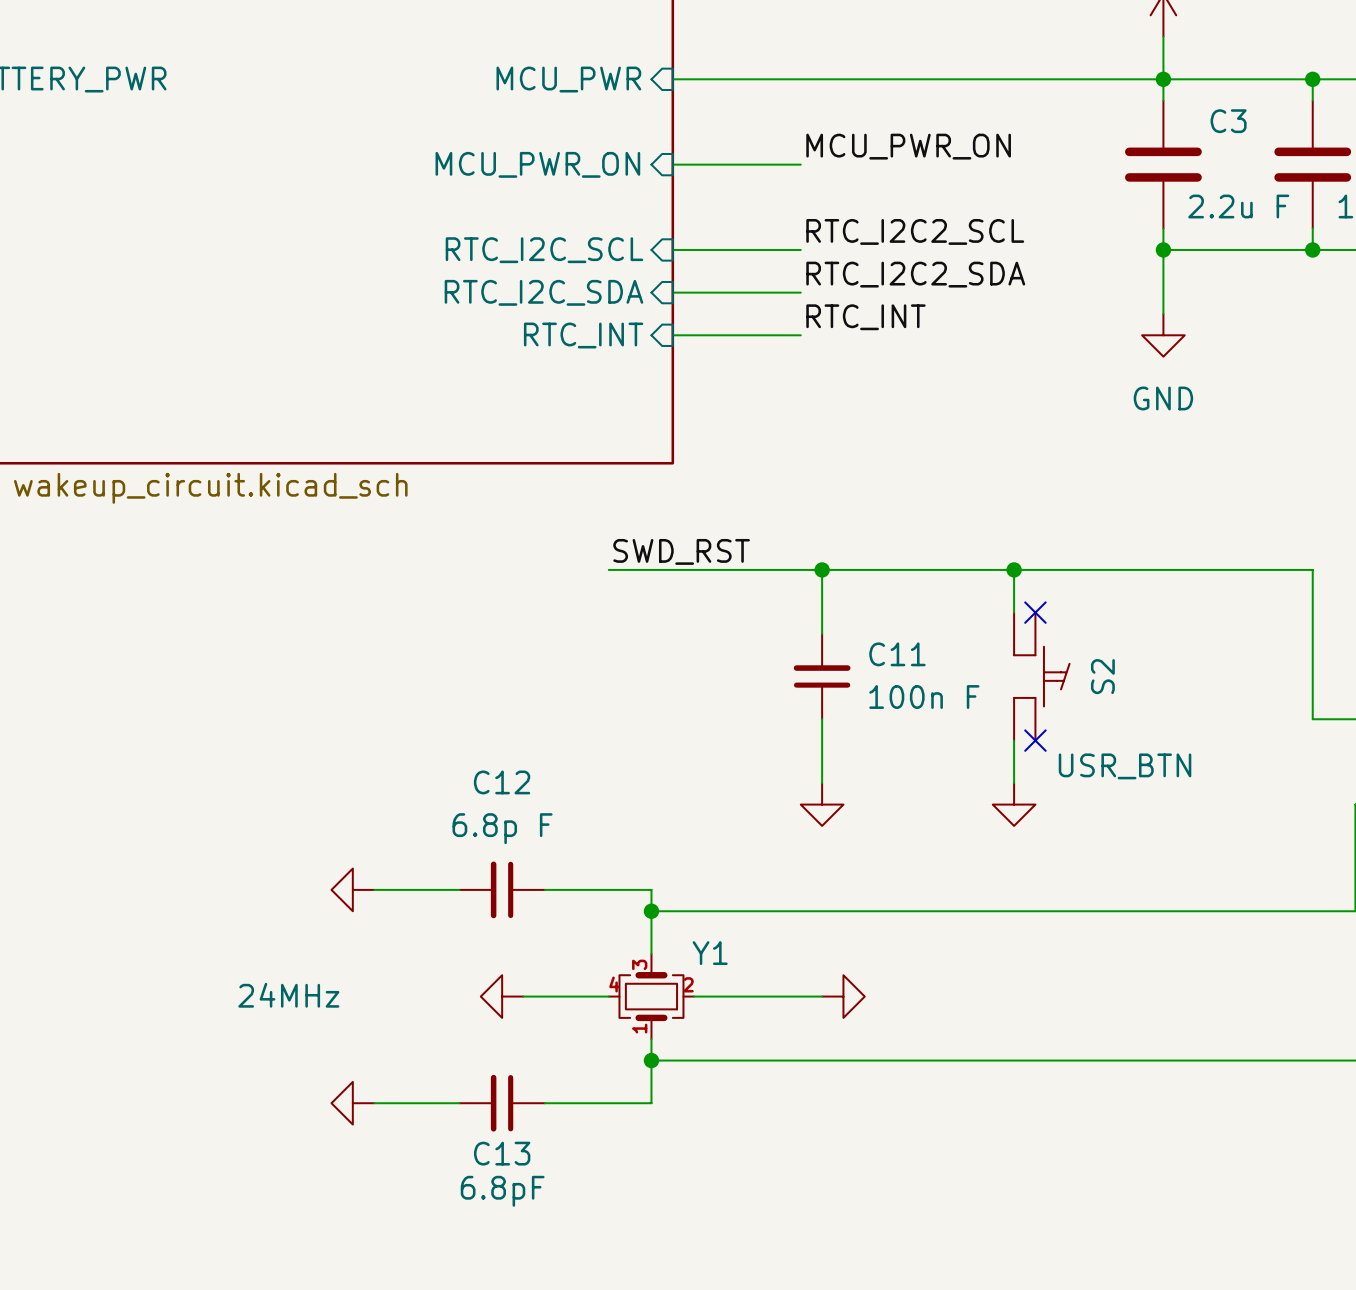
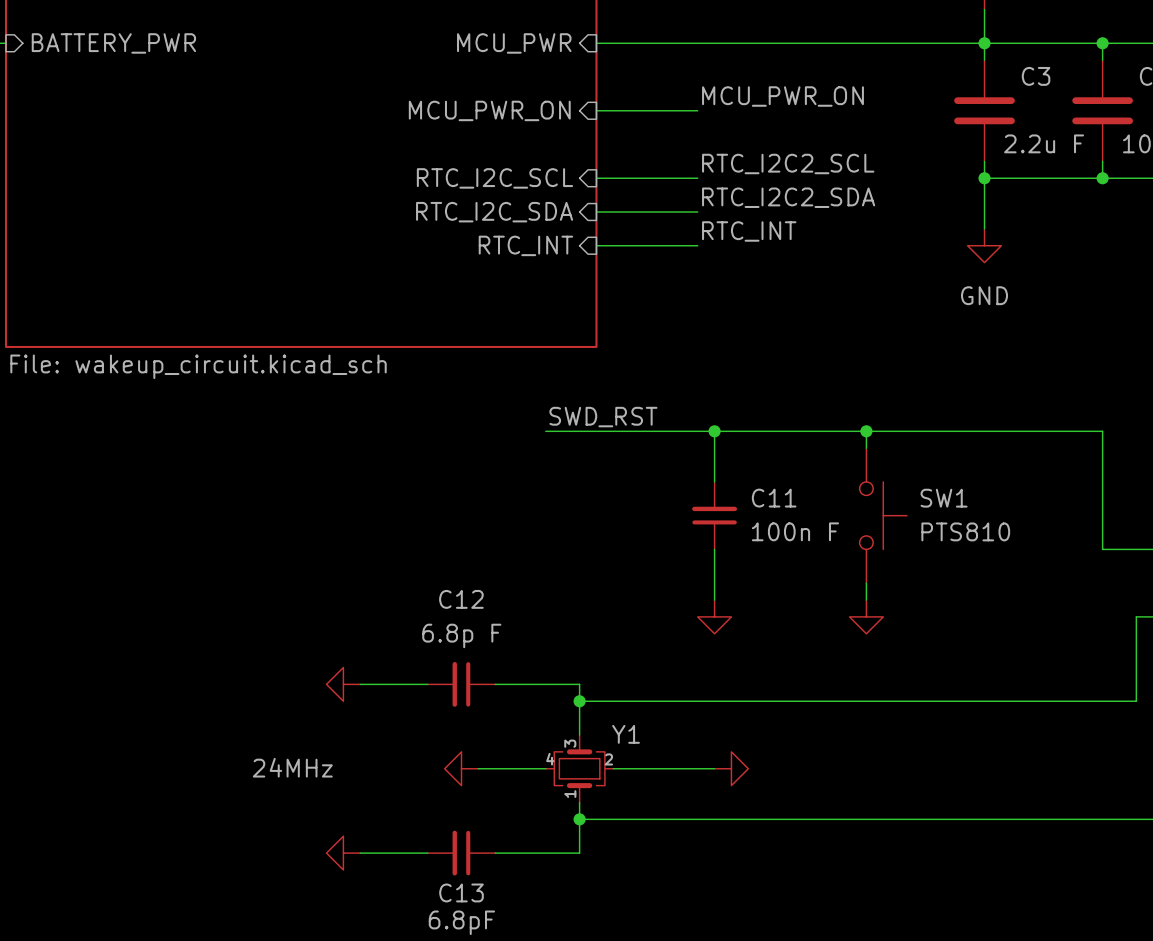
no-connect mark: (1035, 612) -> none
SW1: none -> PTS810 (883, 515)
S2: USR_BTN (1041, 676) -> none
no-connect mark: (1035, 740) -> none

